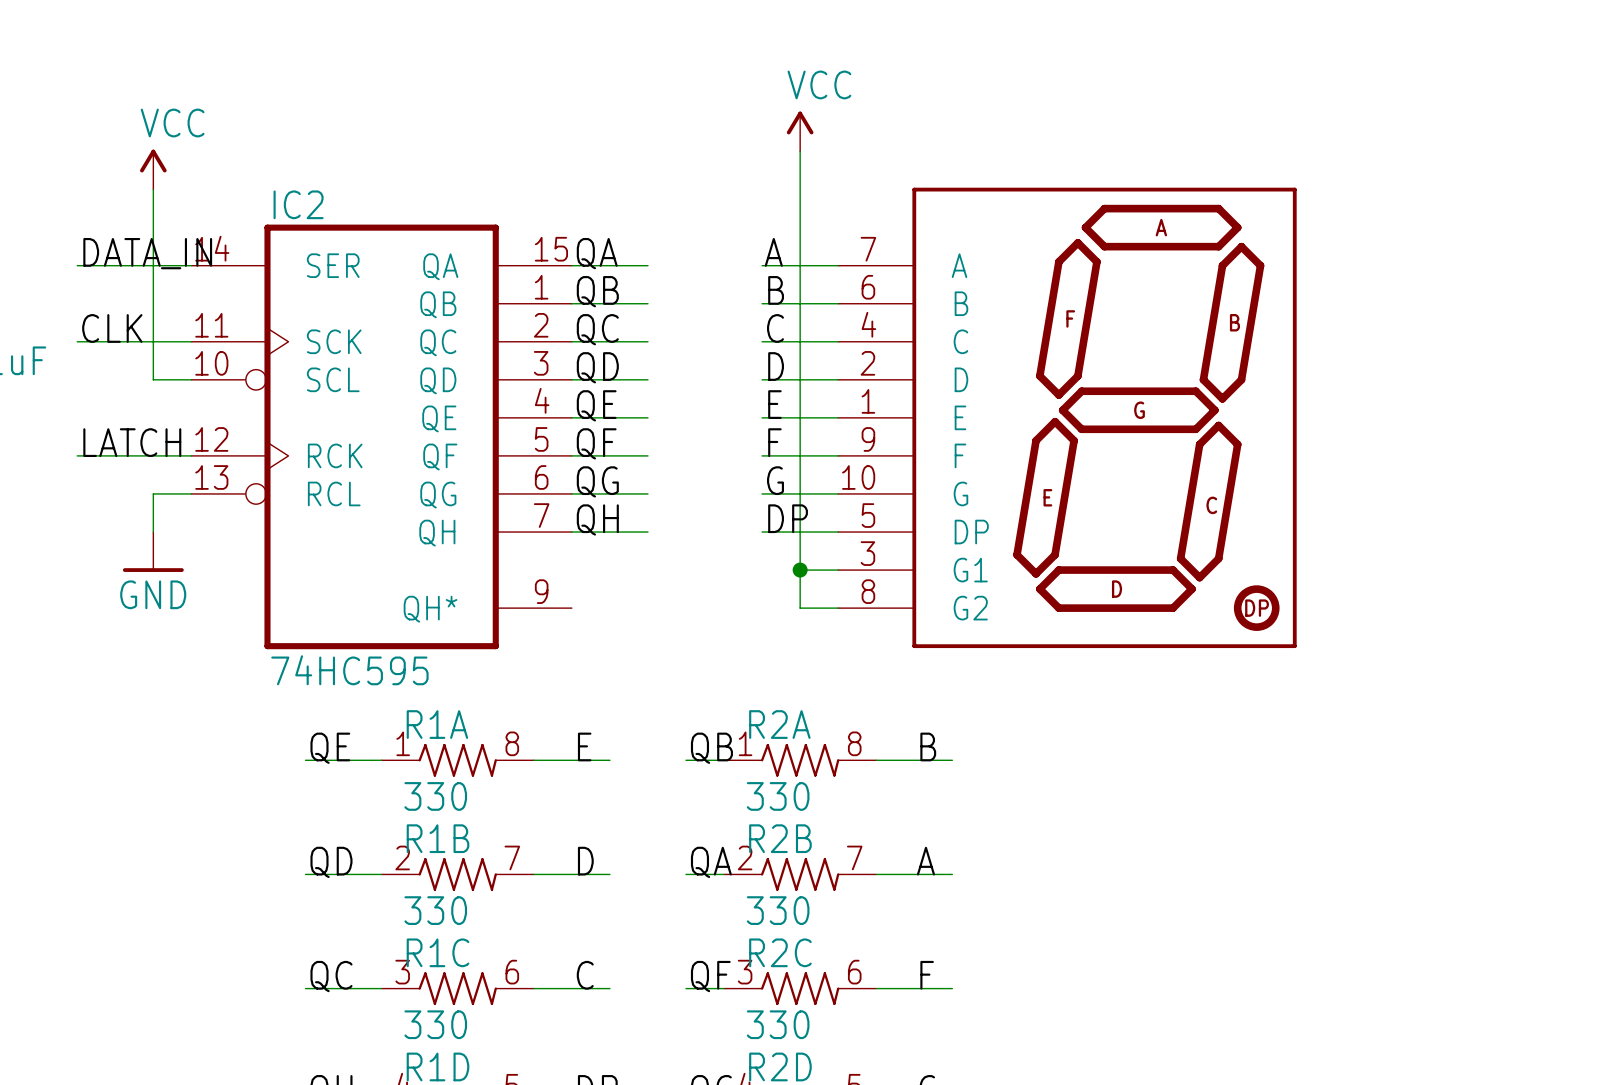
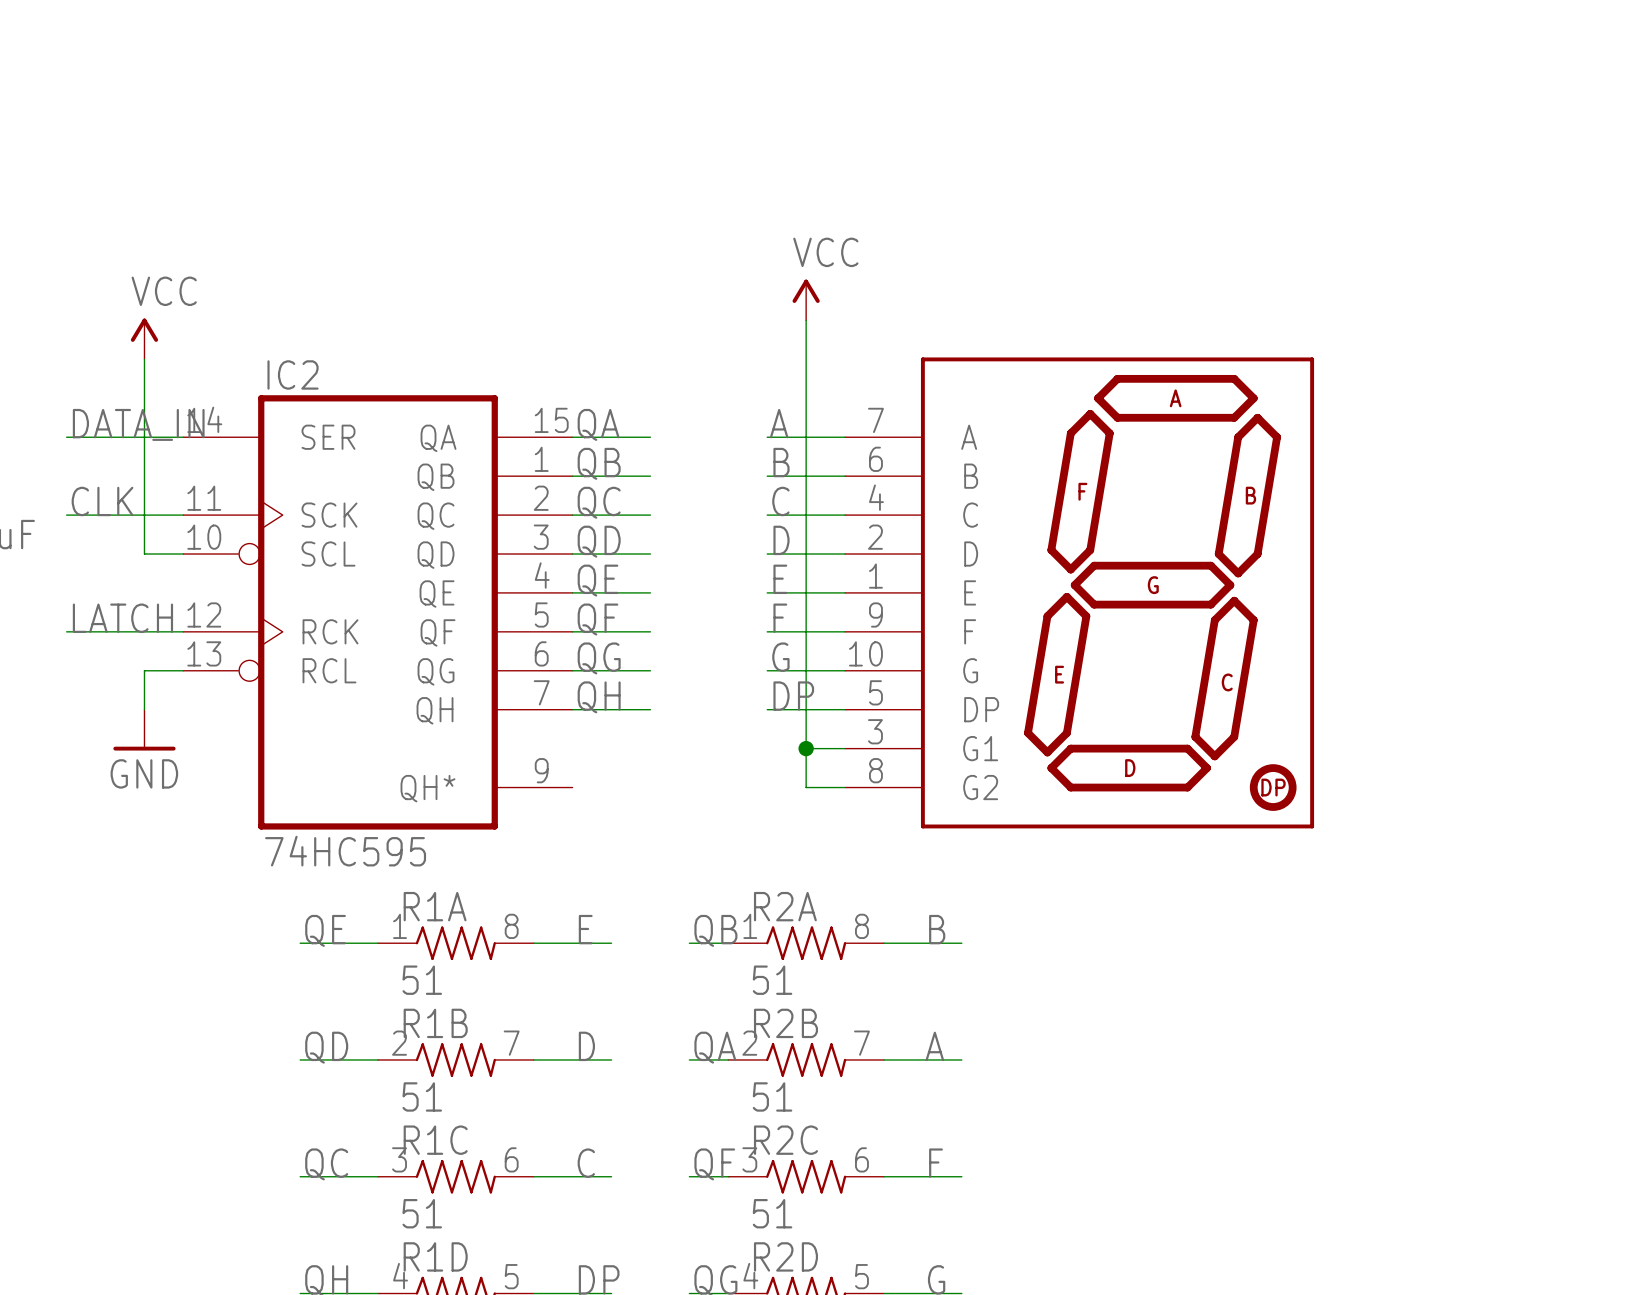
R1A value: 330 (435, 796) -> 51 (422, 980)
R2A value: 330 (778, 796) -> 51 (772, 980)
R1B value: 330 (435, 910) -> 51 (422, 1096)
R2B value: 330 (778, 910) -> 51 (772, 1096)
R1C value: 330 (435, 1024) -> 51 (422, 1213)
R2C value: 330 (778, 1024) -> 51 (772, 1213)

